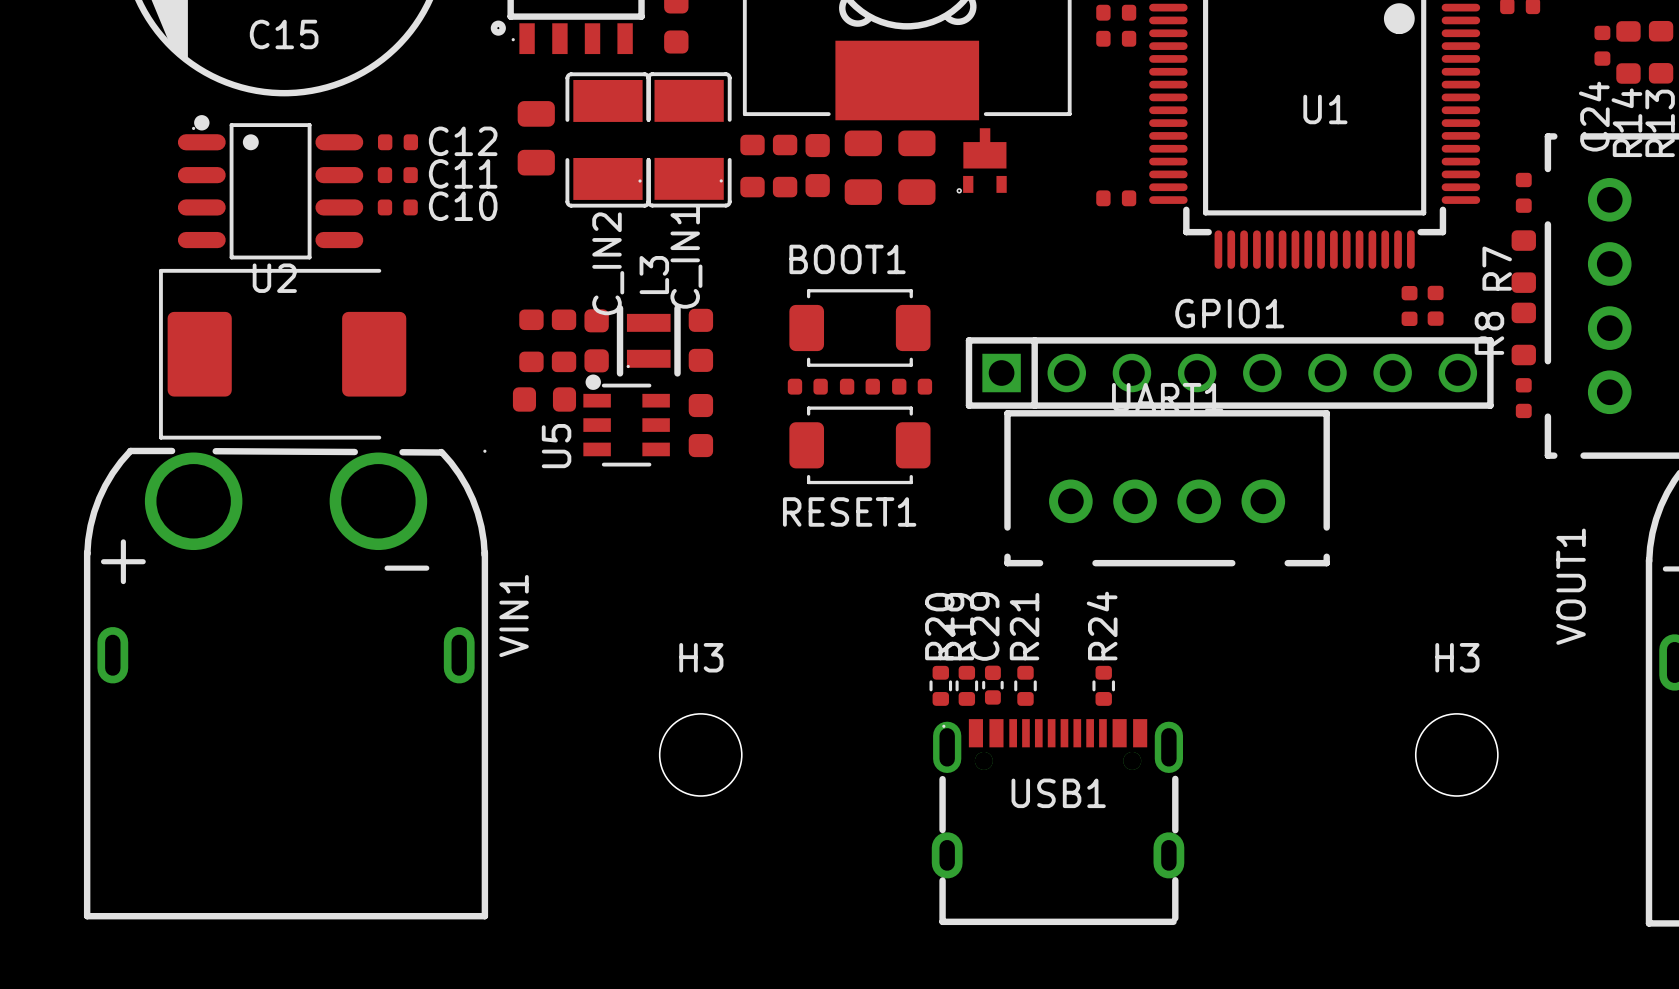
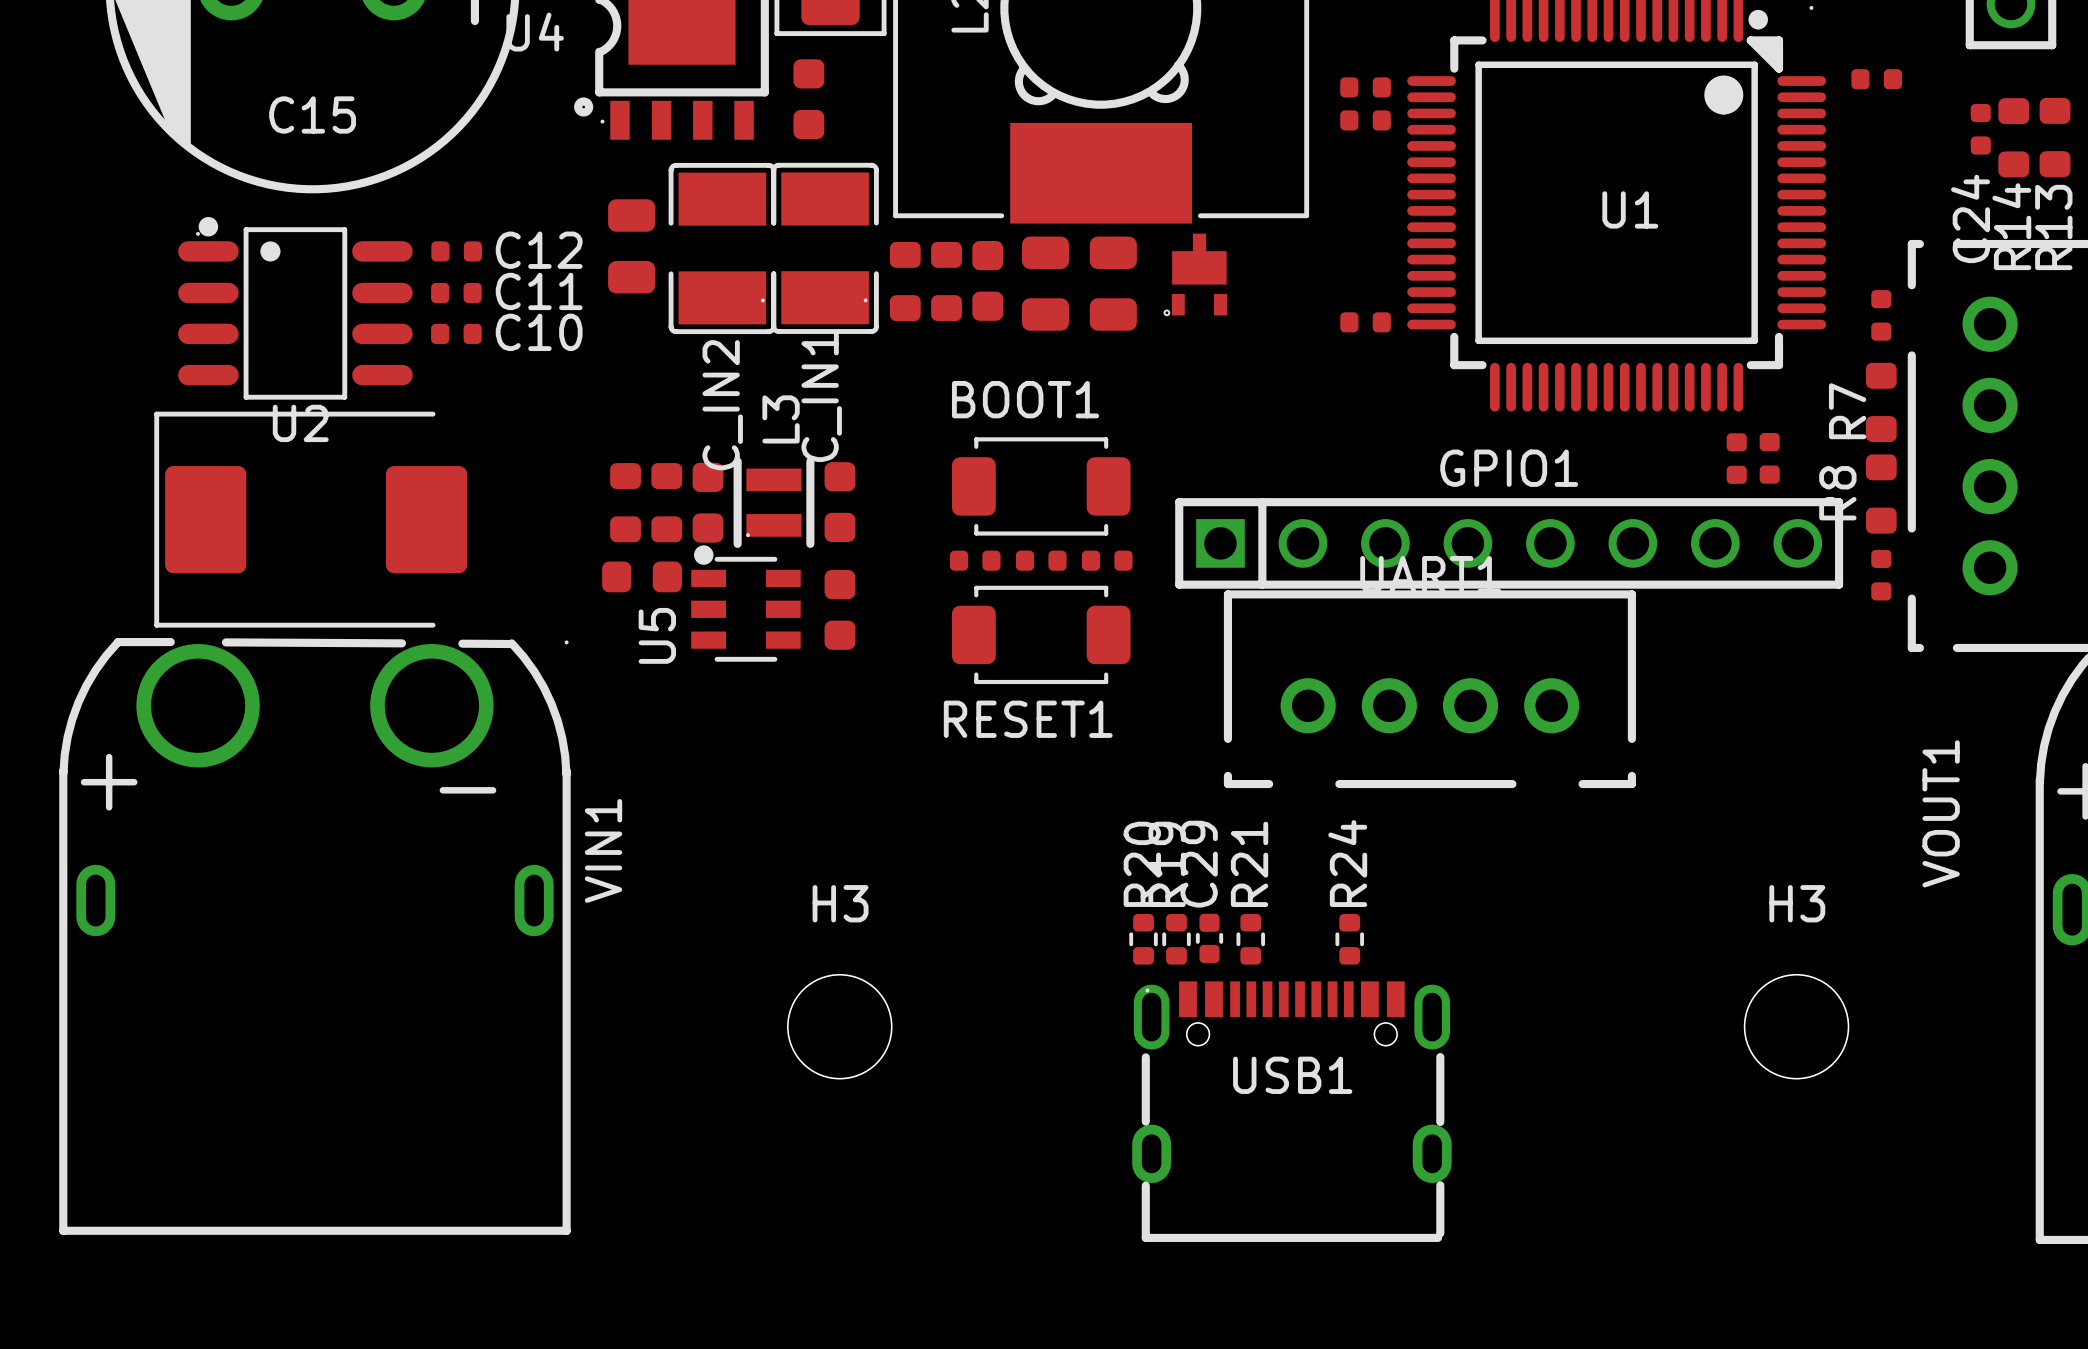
USB1 footprint: [931, 719, 1185, 926] -> [1132, 981, 1452, 1242]

